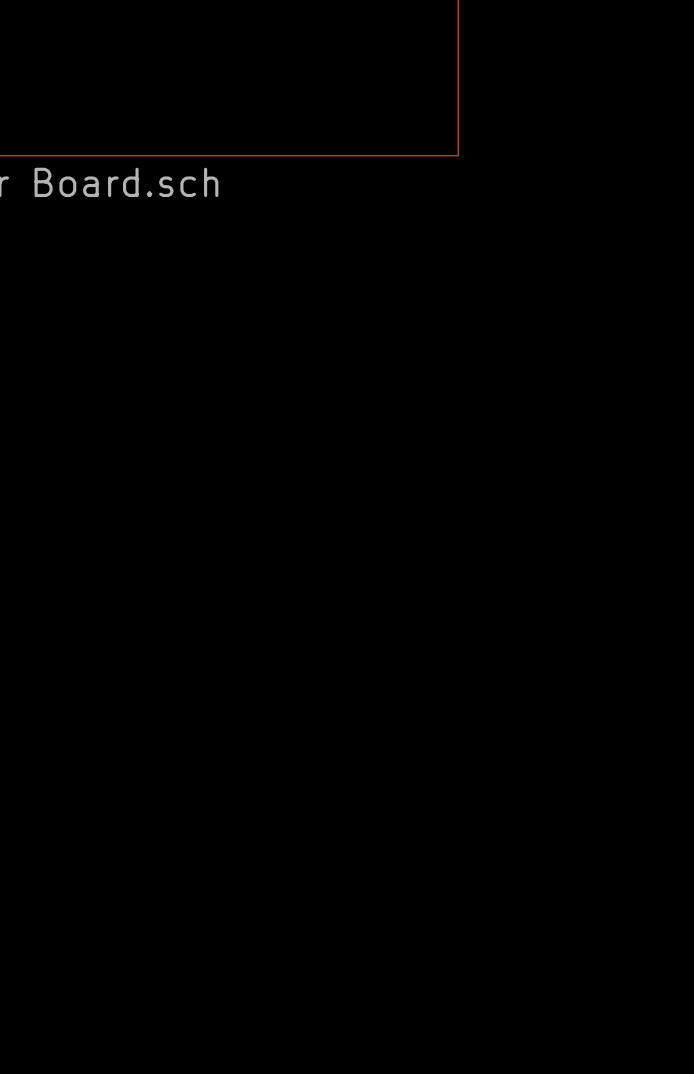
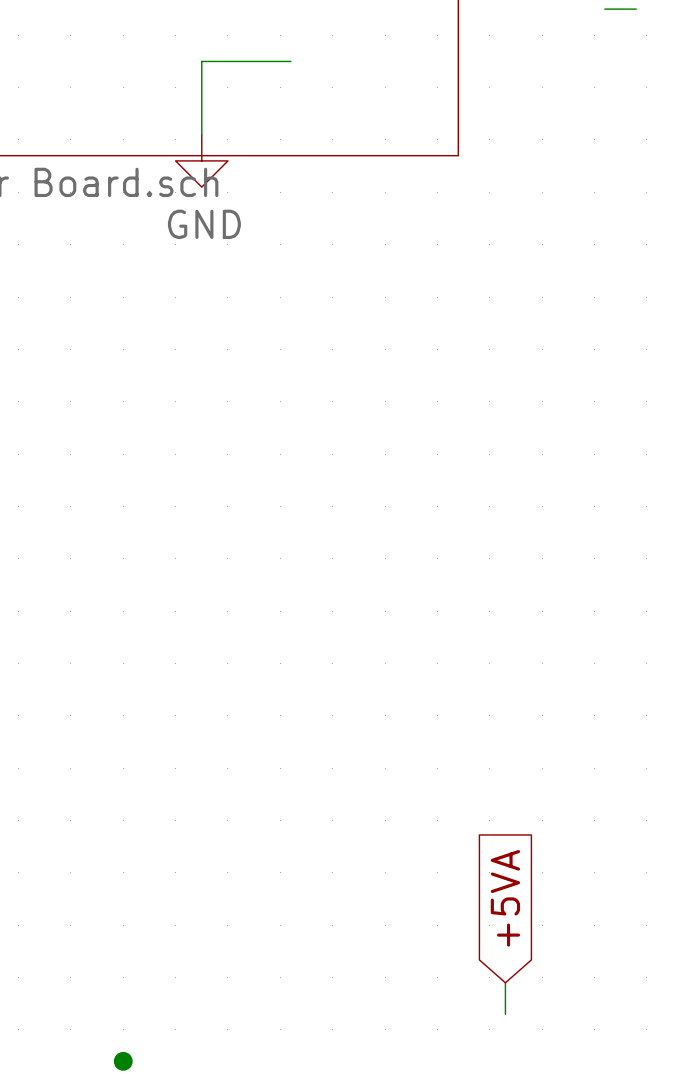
wire: none -> (604, 9) (636, 9)
wire: none -> (290, 61) (201, 61) (201, 134)
power symbol: none -> GND (201, 160)
global label: none -> +5VA (505, 898)
wire: none -> (505, 982) (505, 1014)
junction: none -> (123, 1061)

